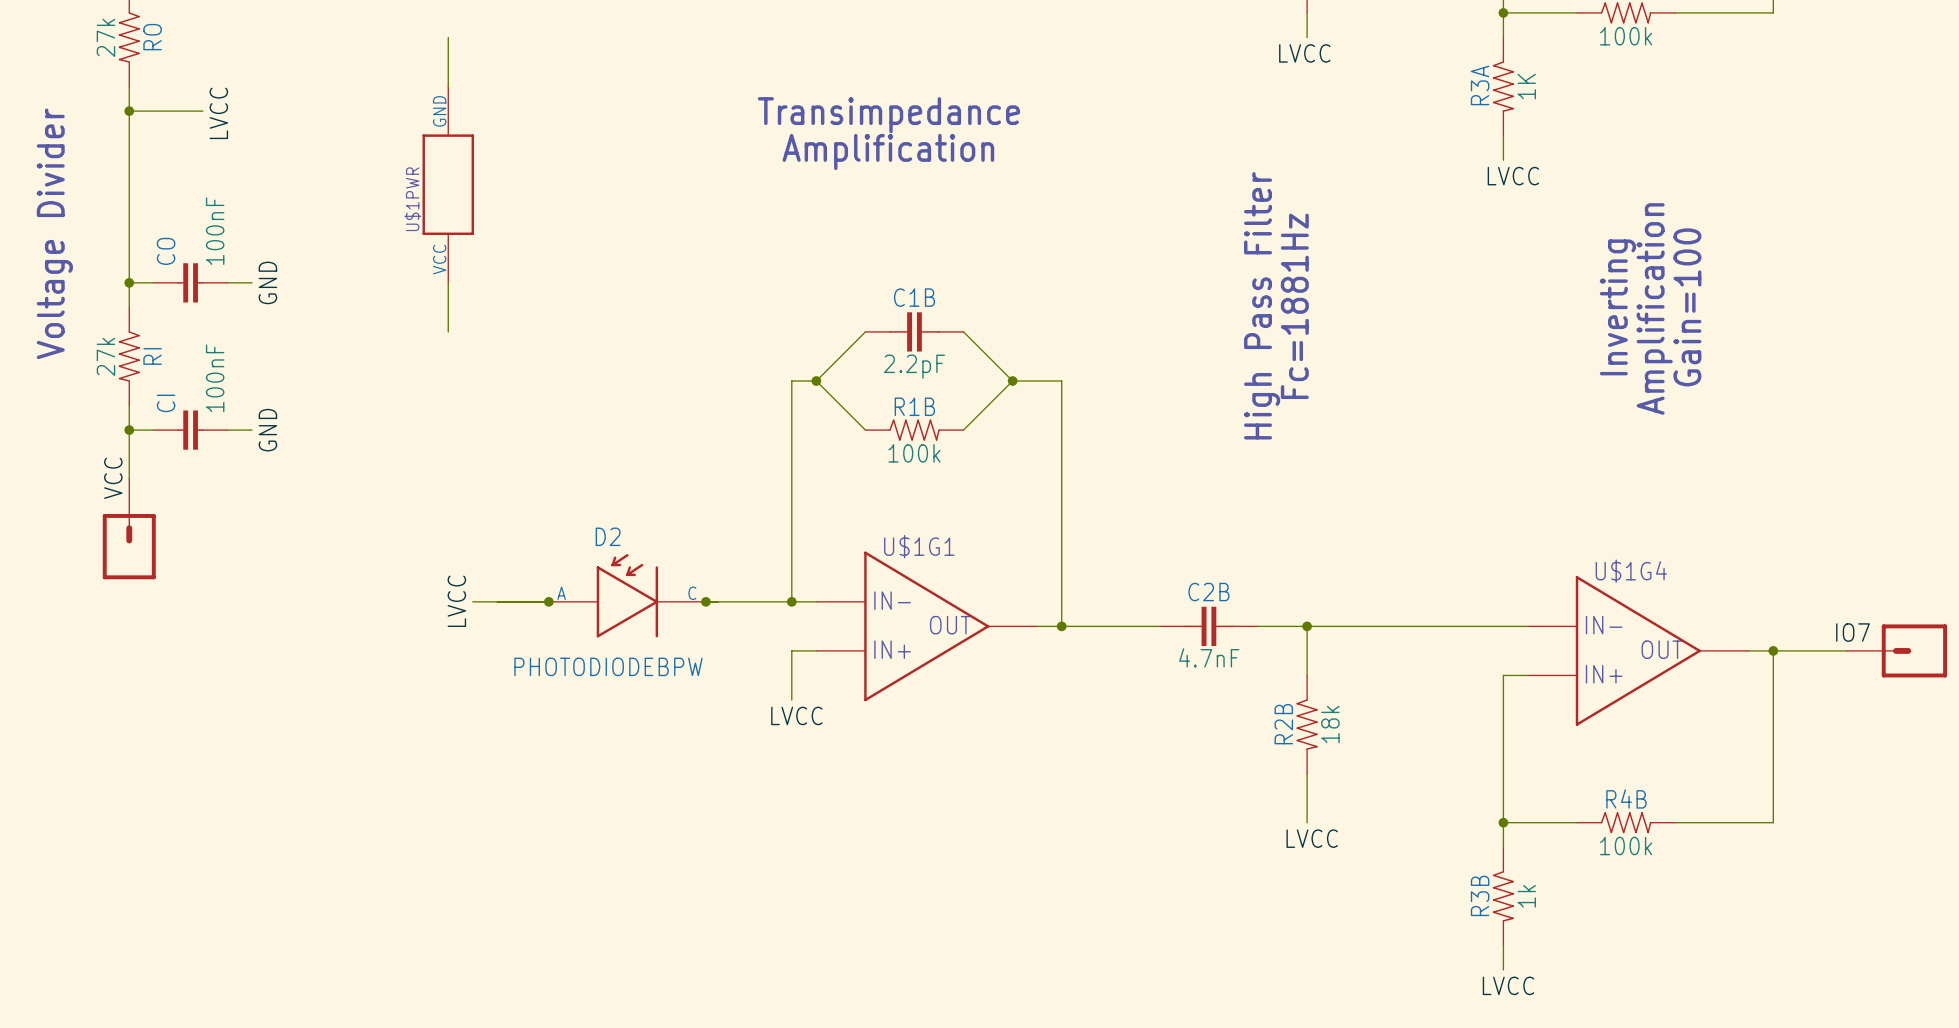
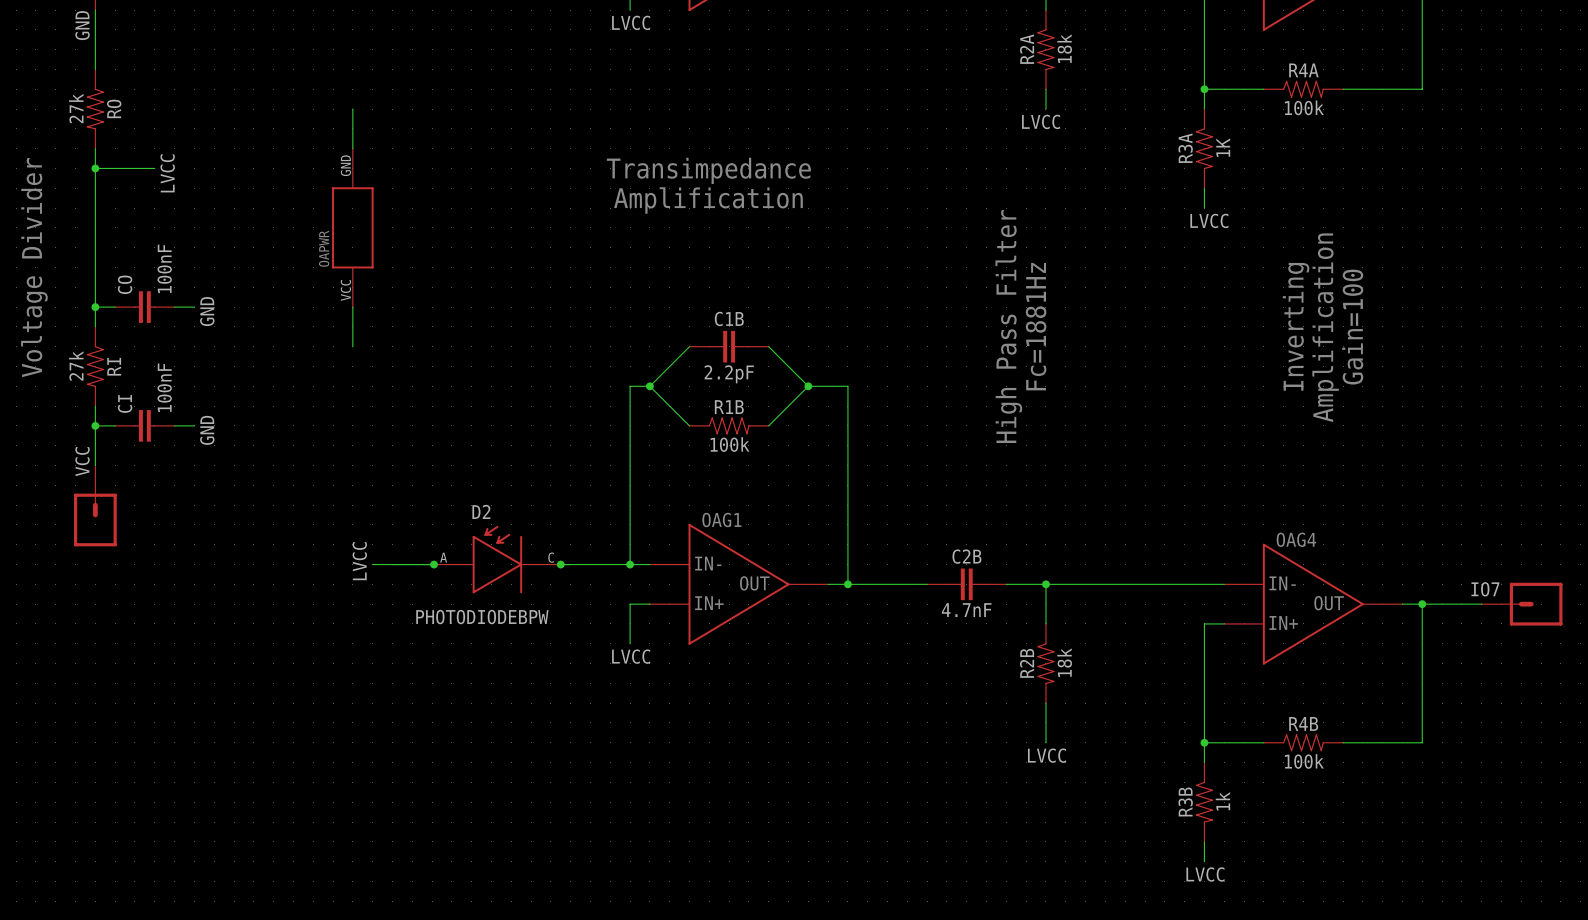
U$1PWR name: U$1PWR (412, 199) -> OAPWR (324, 248)
U$1G1 name: U$1G1 (919, 546) -> OAG1 (721, 520)
U$1G4 name: U$1G4 (1631, 571) -> OAG4 (1296, 539)

